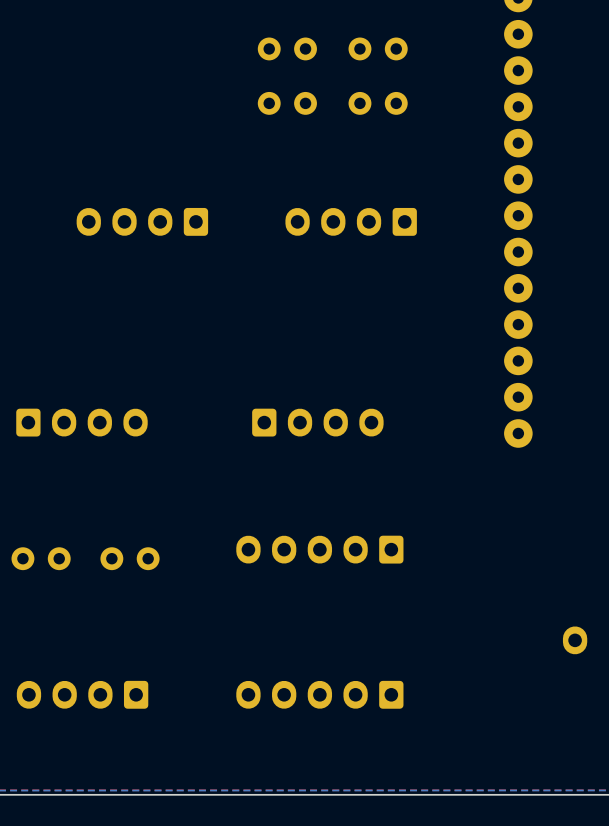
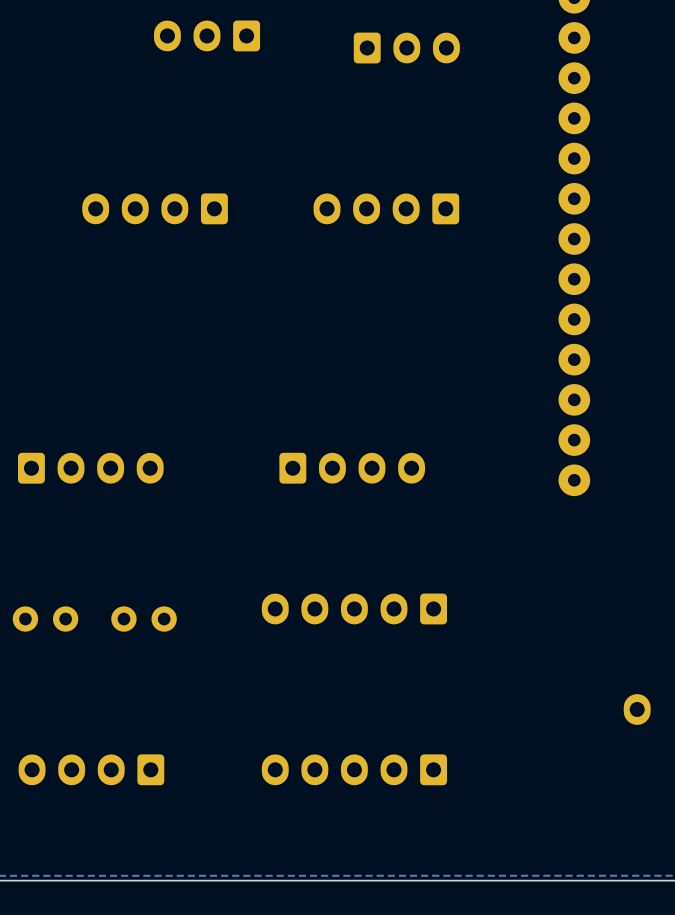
part: none -> (207, 35)
part footprint: [348, 37, 408, 61] -> [353, 32, 460, 64]
part: (287, 48) -> none
part: (287, 103) -> none
part: (378, 103) -> none
part position: (142, 221) -> (155, 208)
part position: (351, 221) -> (386, 208)

